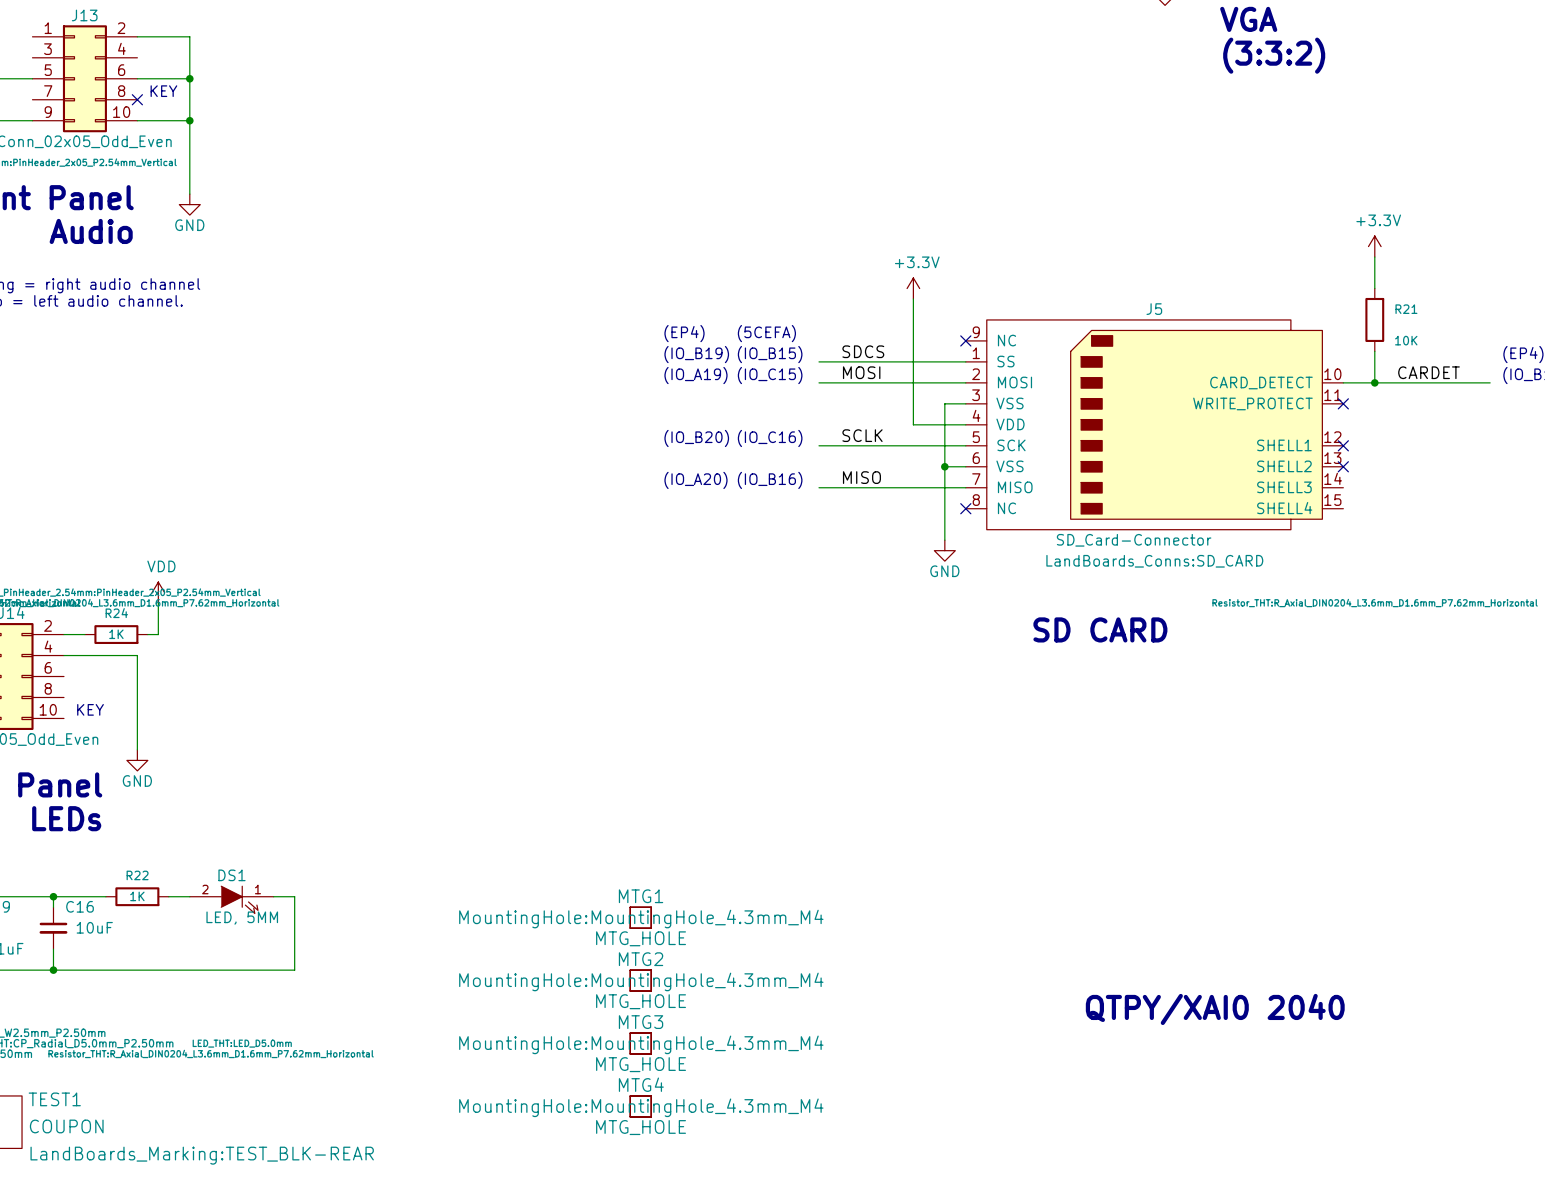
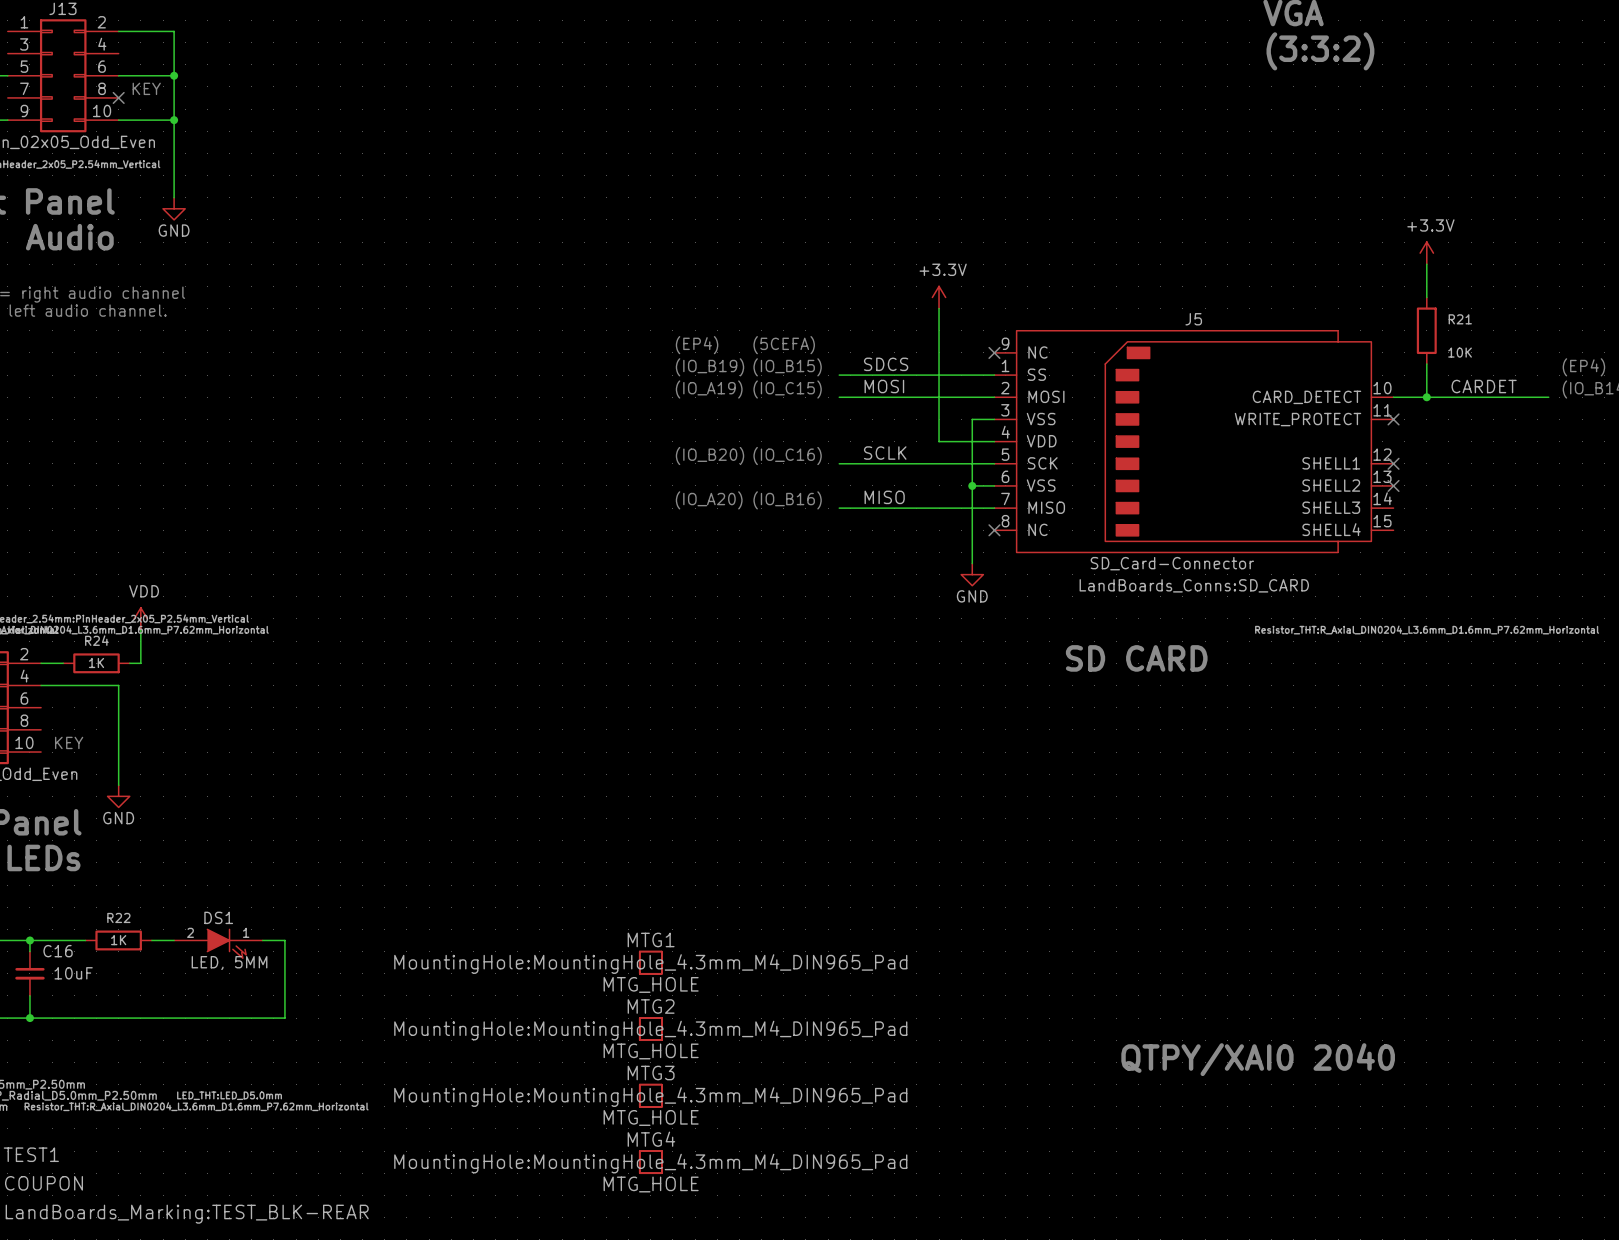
MTG1 text: MountingHole:MountingHole_4.3mm_M4 (641, 919) -> MountingHole:MountingHole_4.3mm_M4_DIN965_Pad (650, 964)
MTG2 text: MountingHole:MountingHole_4.3mm_M4 (641, 981) -> MountingHole:MountingHole_4.3mm_M4_DIN965_Pad (650, 1030)
MTG3 text: MountingHole:MountingHole_4.3mm_M4 (641, 1044) -> MountingHole:MountingHole_4.3mm_M4_DIN965_Pad (650, 1097)
MTG4 text: MountingHole:MountingHole_4.3mm_M4 (641, 1107) -> MountingHole:MountingHole_4.3mm_M4_DIN965_Pad (650, 1163)

